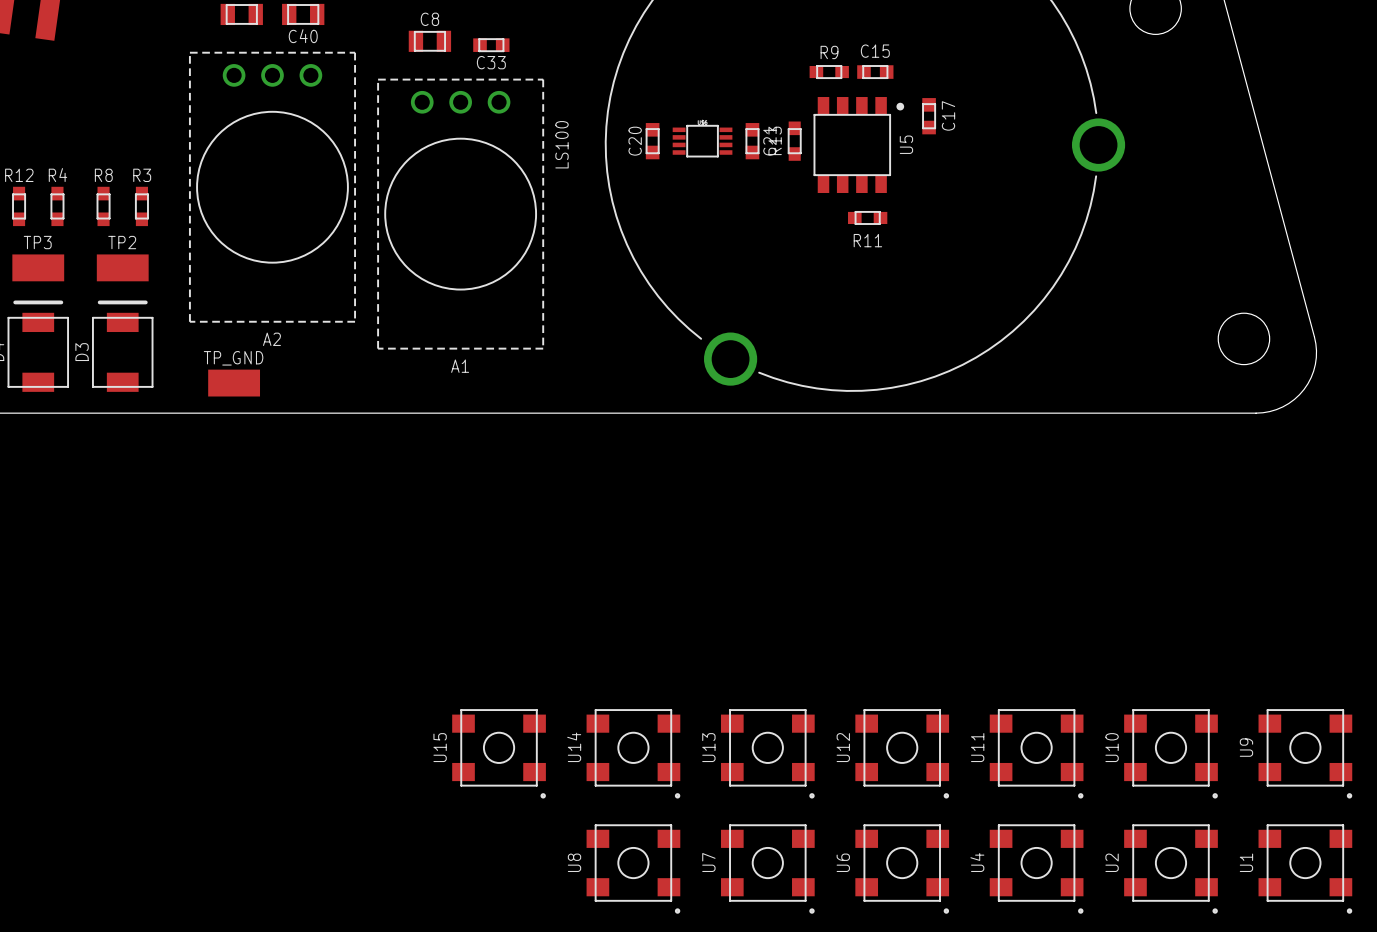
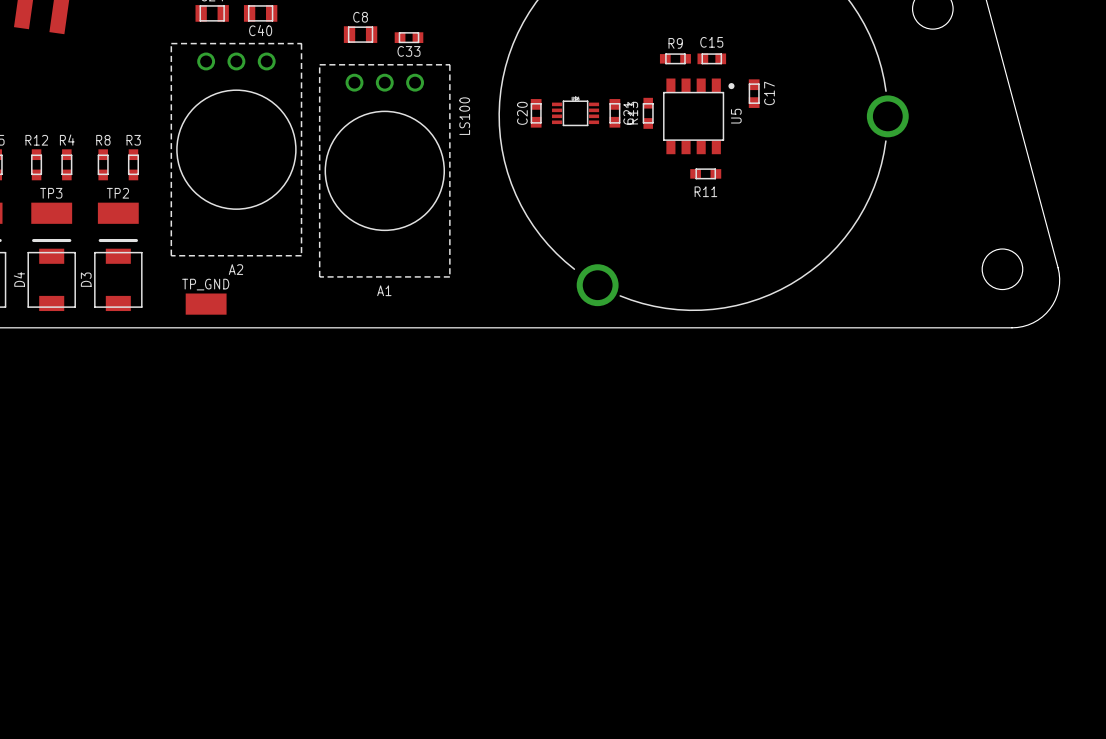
U15: (499, 753) -> none
U14: (633, 753) -> none
U13: (767, 753) -> none
U12: (902, 753) -> none
U11: (1036, 753) -> none
U10: (1170, 753) -> none
U9: (1305, 753) -> none
U8: (633, 869) -> none
U7: (767, 869) -> none
U6: (902, 869) -> none
U4: (1036, 869) -> none
U2: (1170, 869) -> none
U1: (1305, 869) -> none

